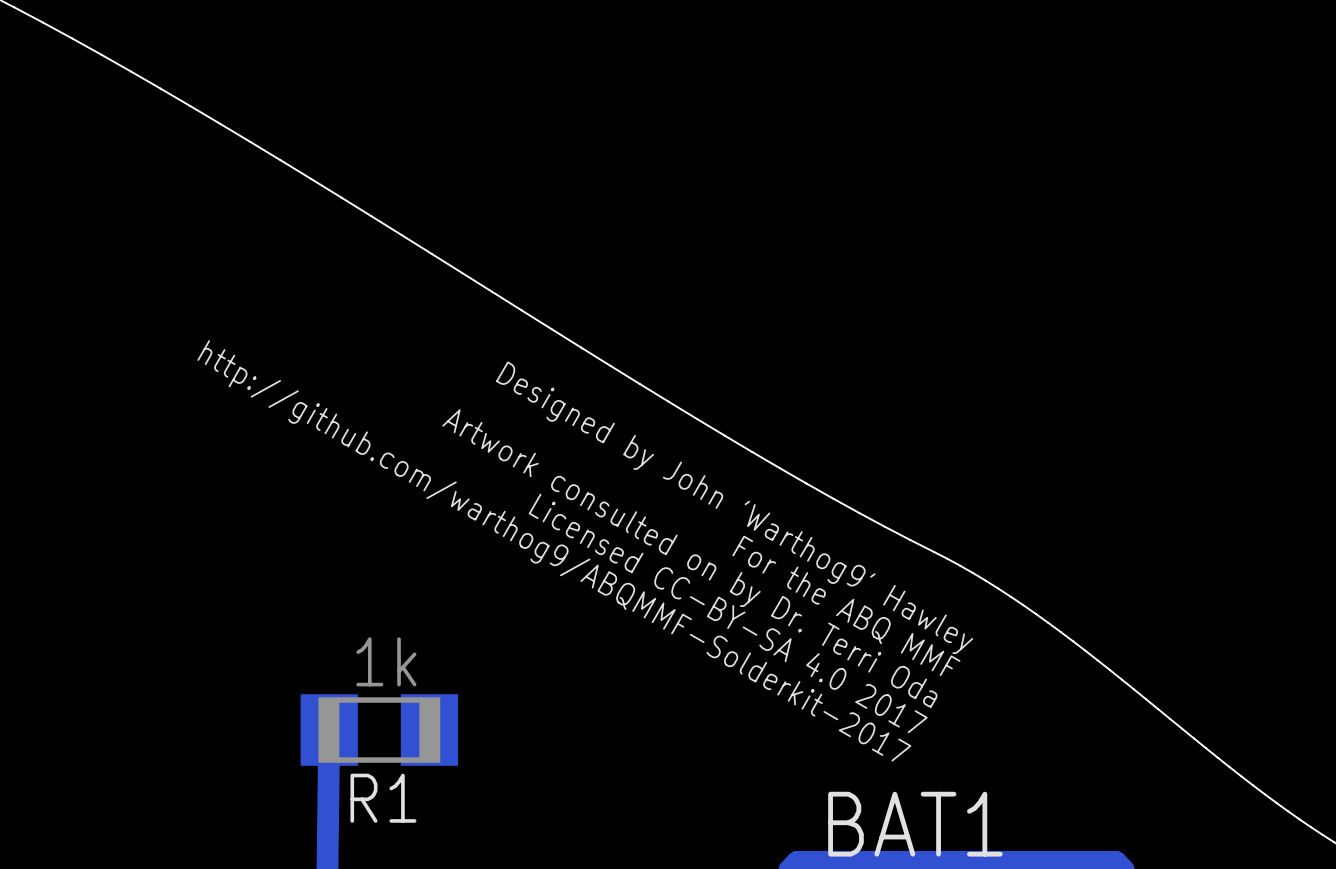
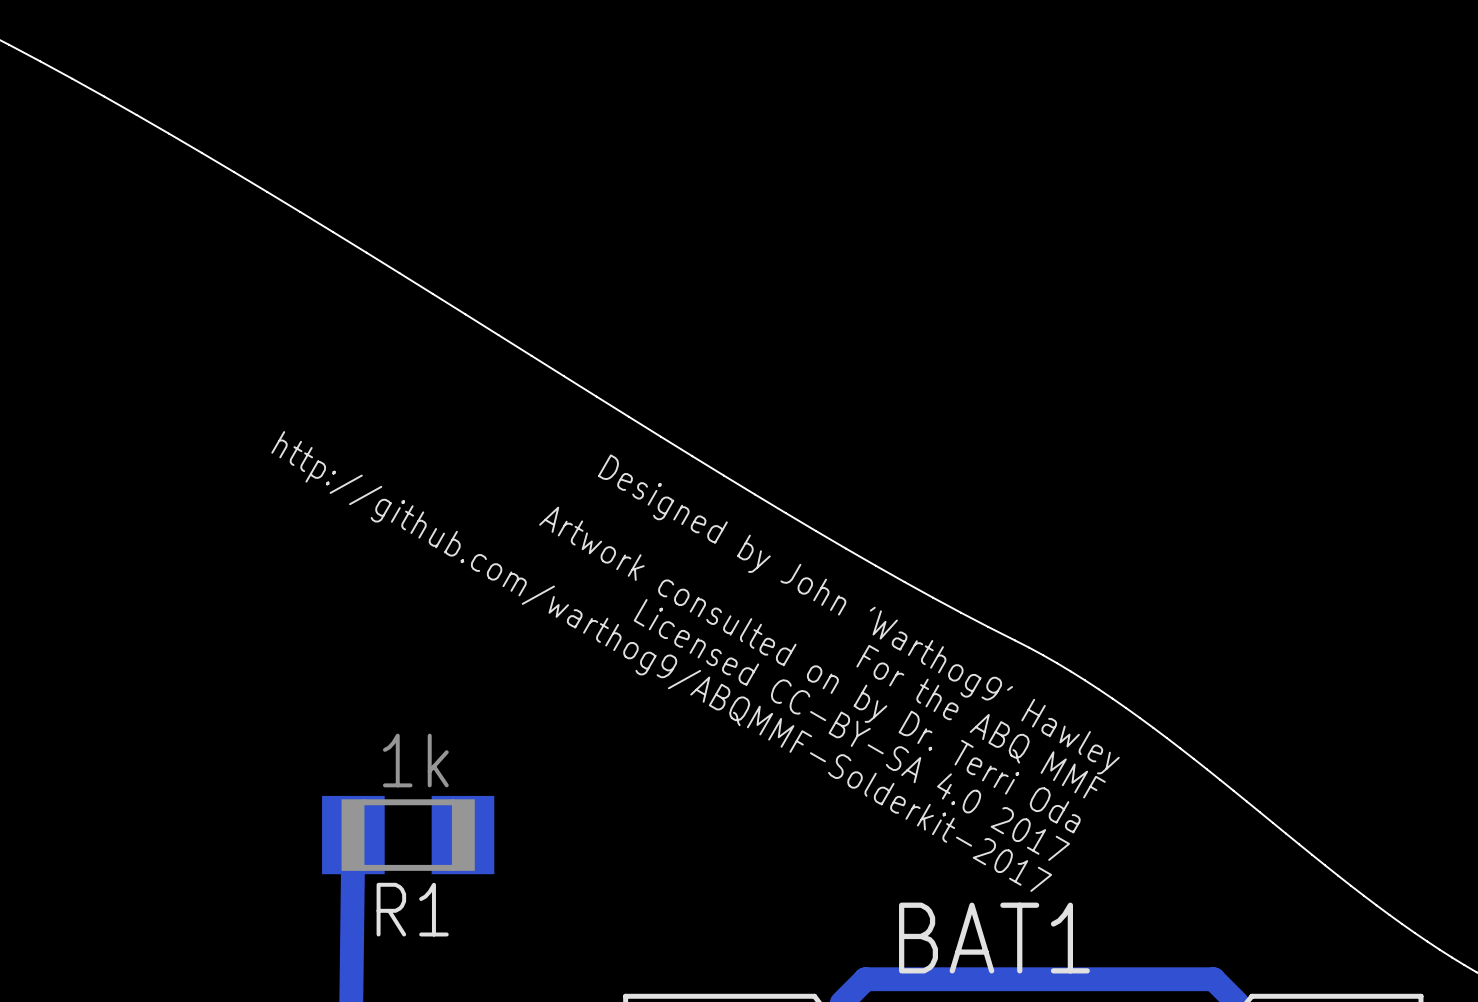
text position: Designed by John 'Warthog9' Hawley (734, 507) -> Designed by John 'Warthog9' Hawley (858, 614)
text position: http://github.com/warthog9/ABQMMF-Solderkit-2017 (554, 550) -> http://github.com/warthog9/ABQMMF-Solderkit-2017 (661, 661)
text position: Artwork consulted on by Dr. Terri Oda (689, 558) -> Artwork consulted on by Dr. Terri Oda (809, 670)
text position: For the ABQ MMF (846, 605) -> For the ABQ MMF (981, 721)
text position: Licensed CC-BY-SA 4.0 2017 (728, 613) -> Licensed CC-BY-SA 4.0 2017 (851, 729)

